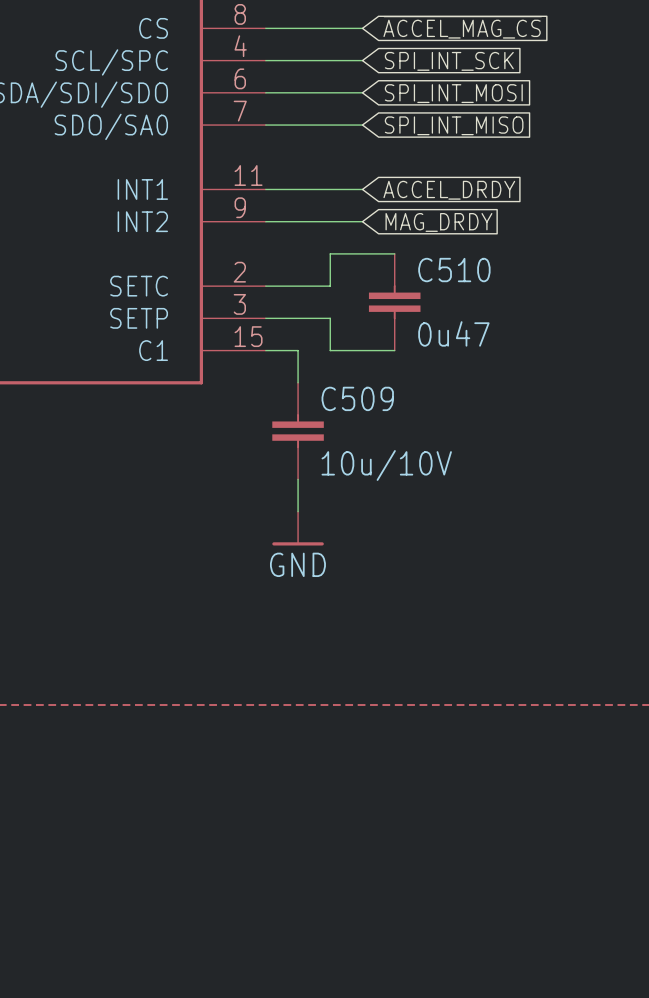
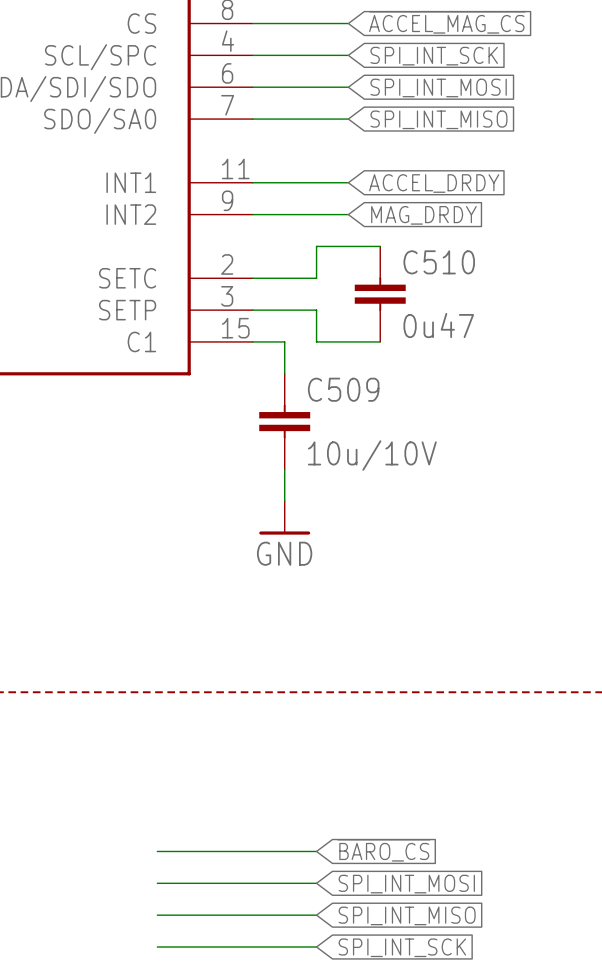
global label: none -> ~{BARO_CS} (383, 850)
wire: none -> (157, 851) (316, 851)
wire: none -> (157, 883) (316, 883)
global label: none -> SPI_INT_MOSI (406, 884)
wire: none -> (157, 915) (316, 915)
global label: none -> SPI_INT_MISO (407, 915)
wire: none -> (157, 947) (316, 947)
global label: none -> SPI_INT_SCK (402, 947)

